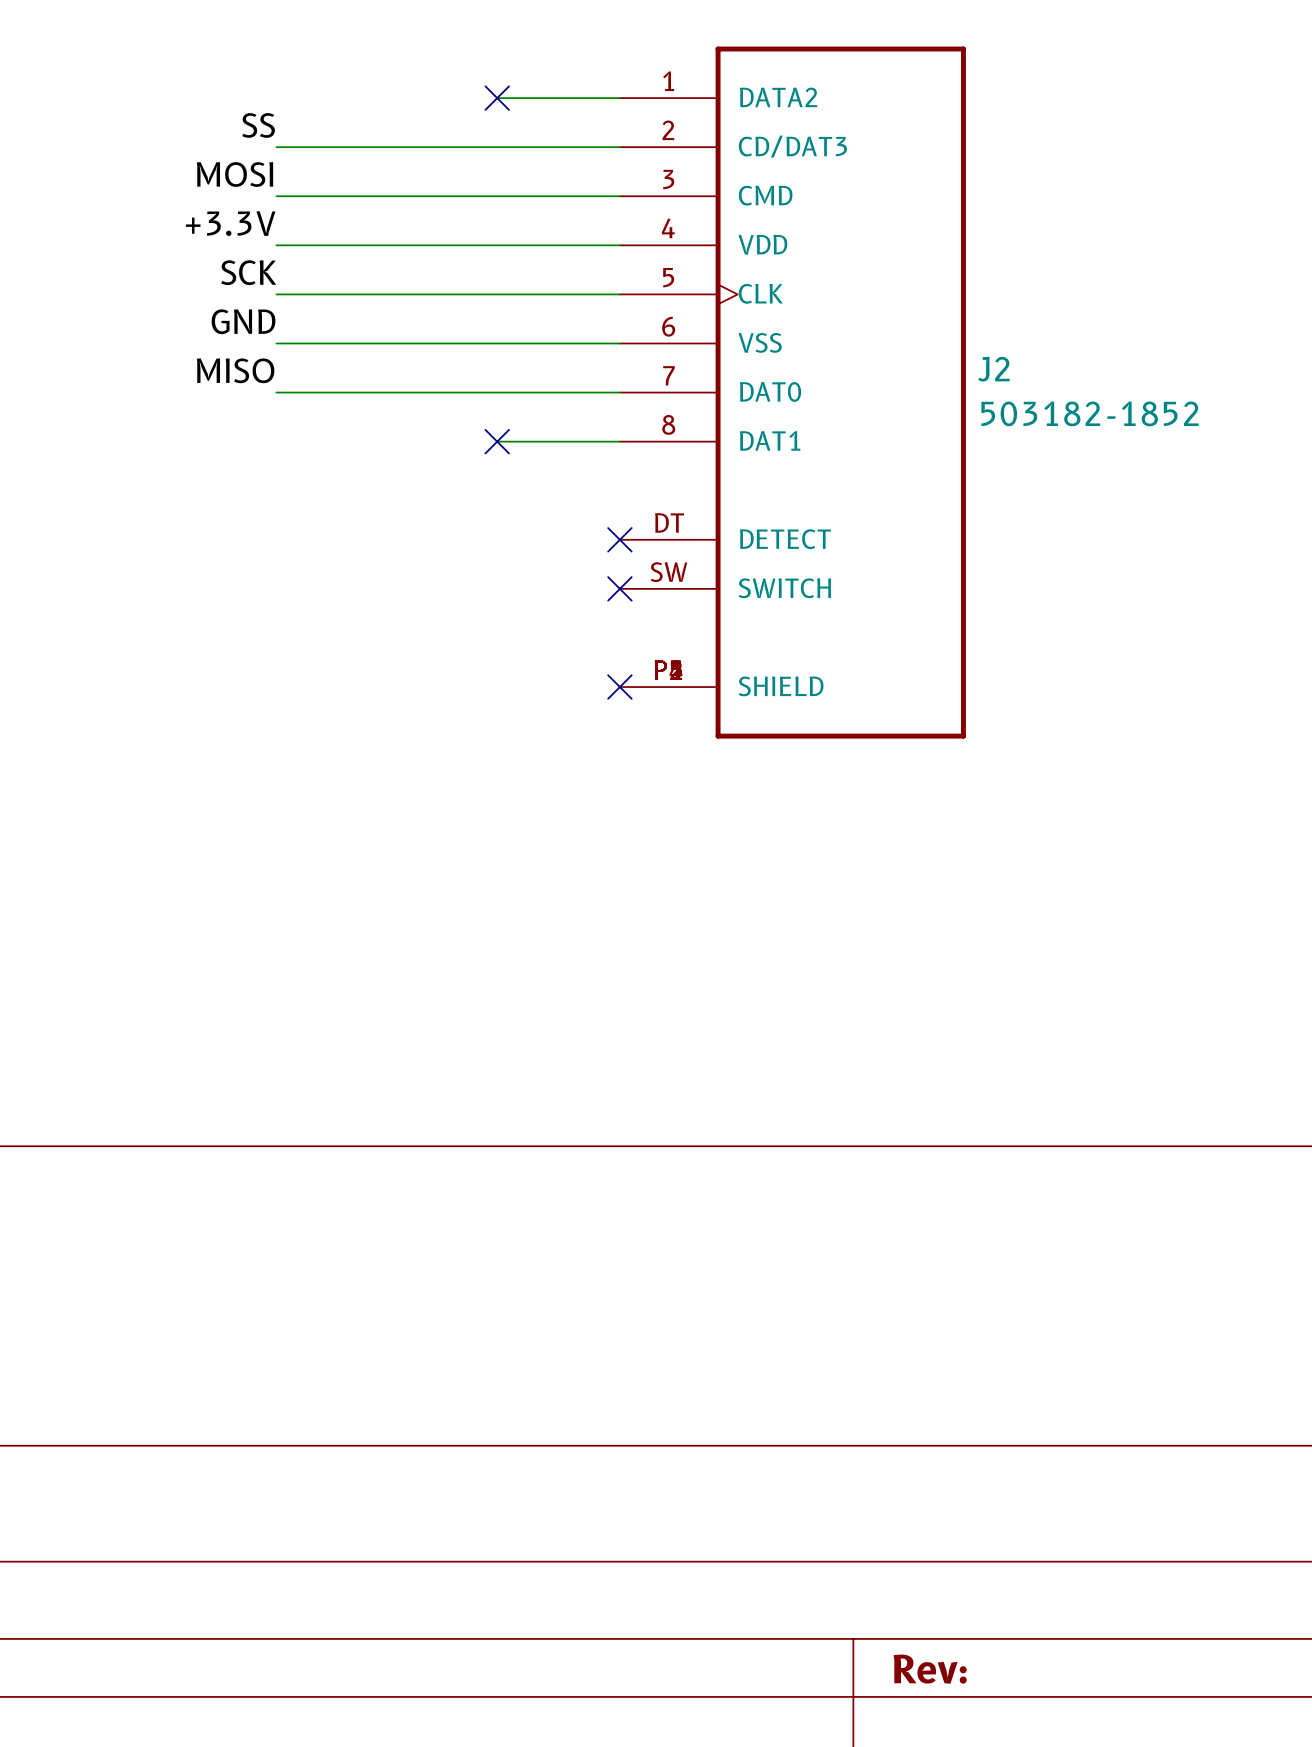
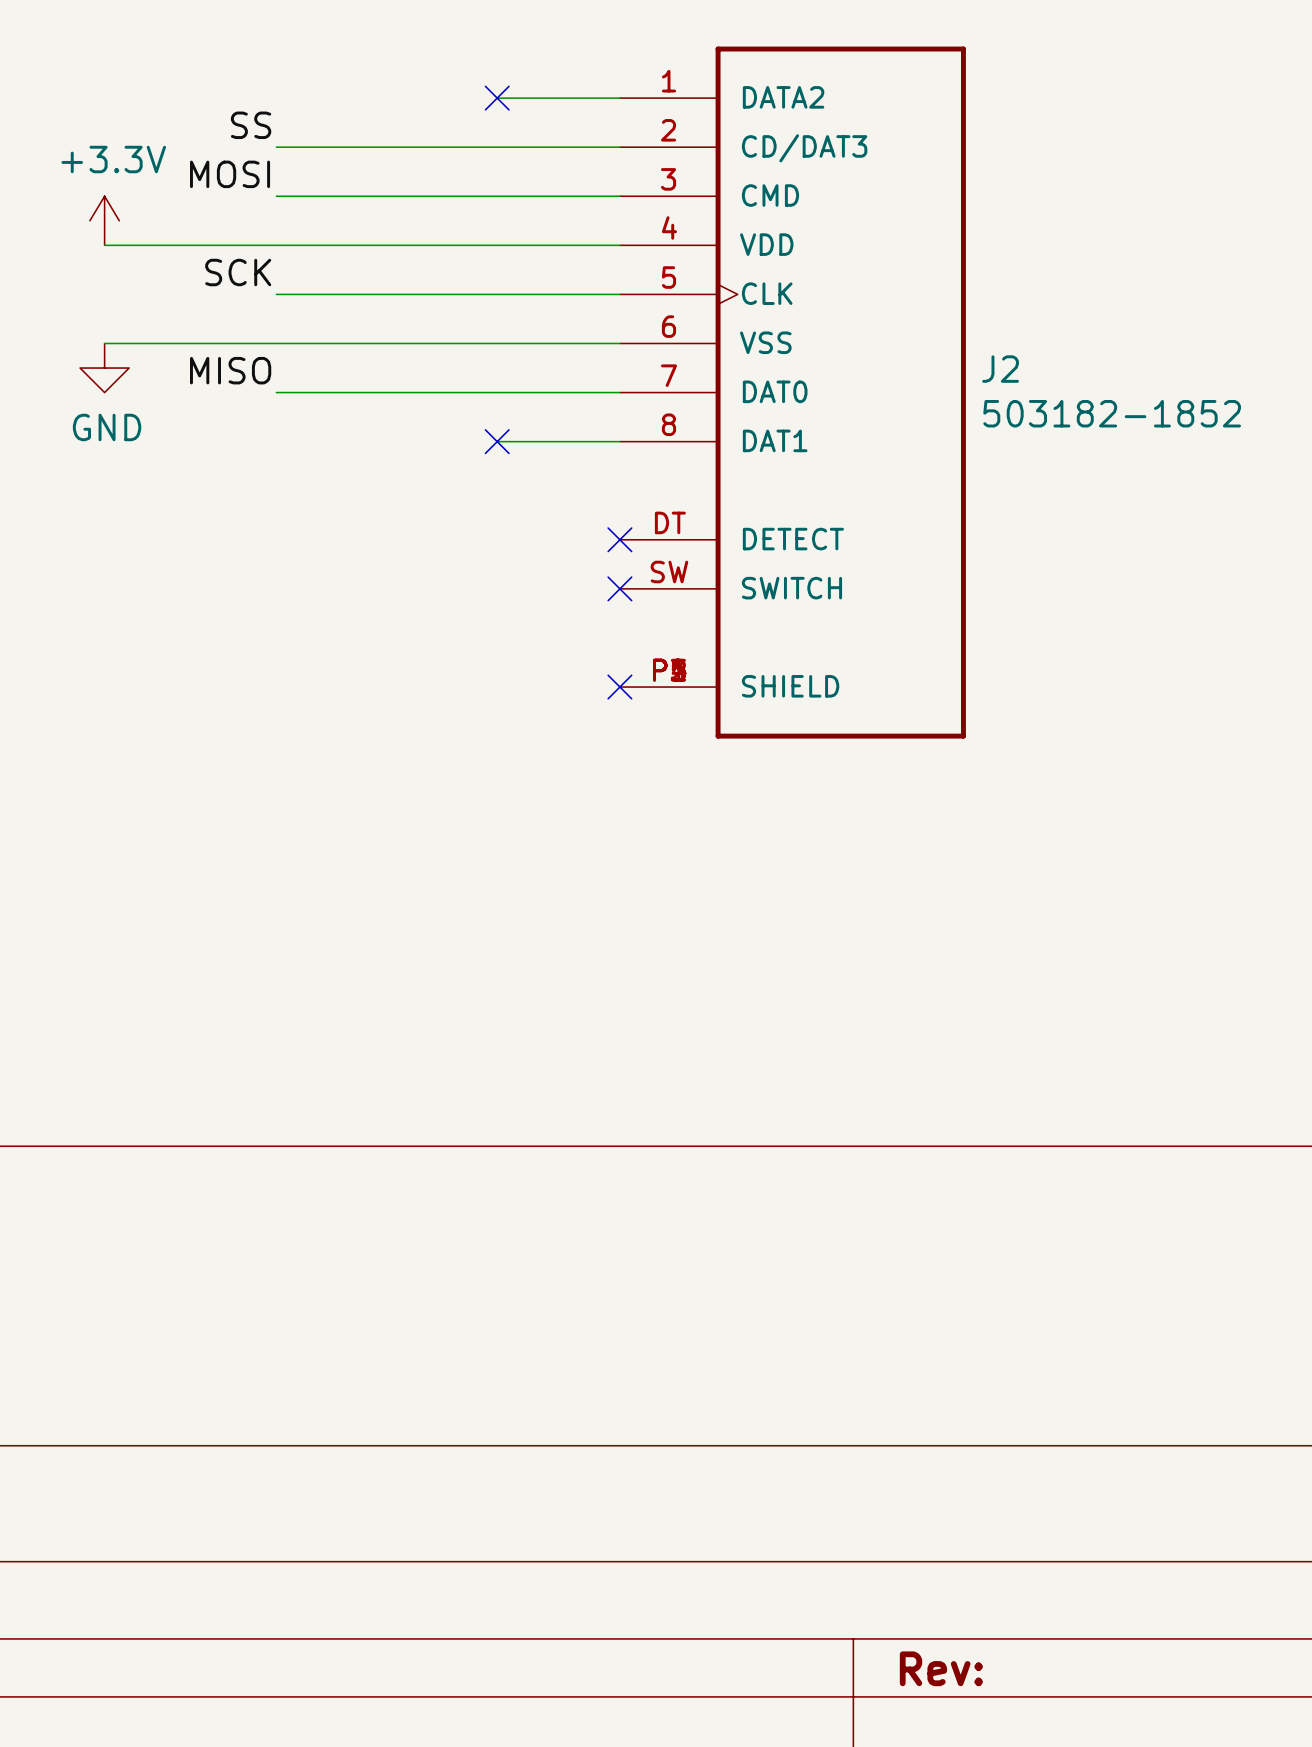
power symbol: none -> +3.3V (104, 220)
label: +3.3V (230, 223) -> none
wire: none -> (104, 245) (276, 245)
label: GND (243, 321) -> none
wire: none -> (104, 343) (276, 343)
power symbol: none -> GND (104, 368)

